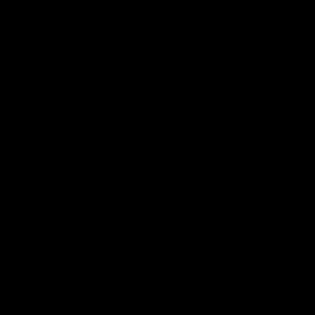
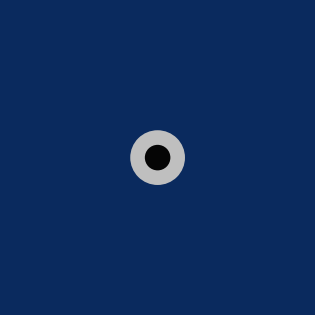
via: none -> (157, 157)

